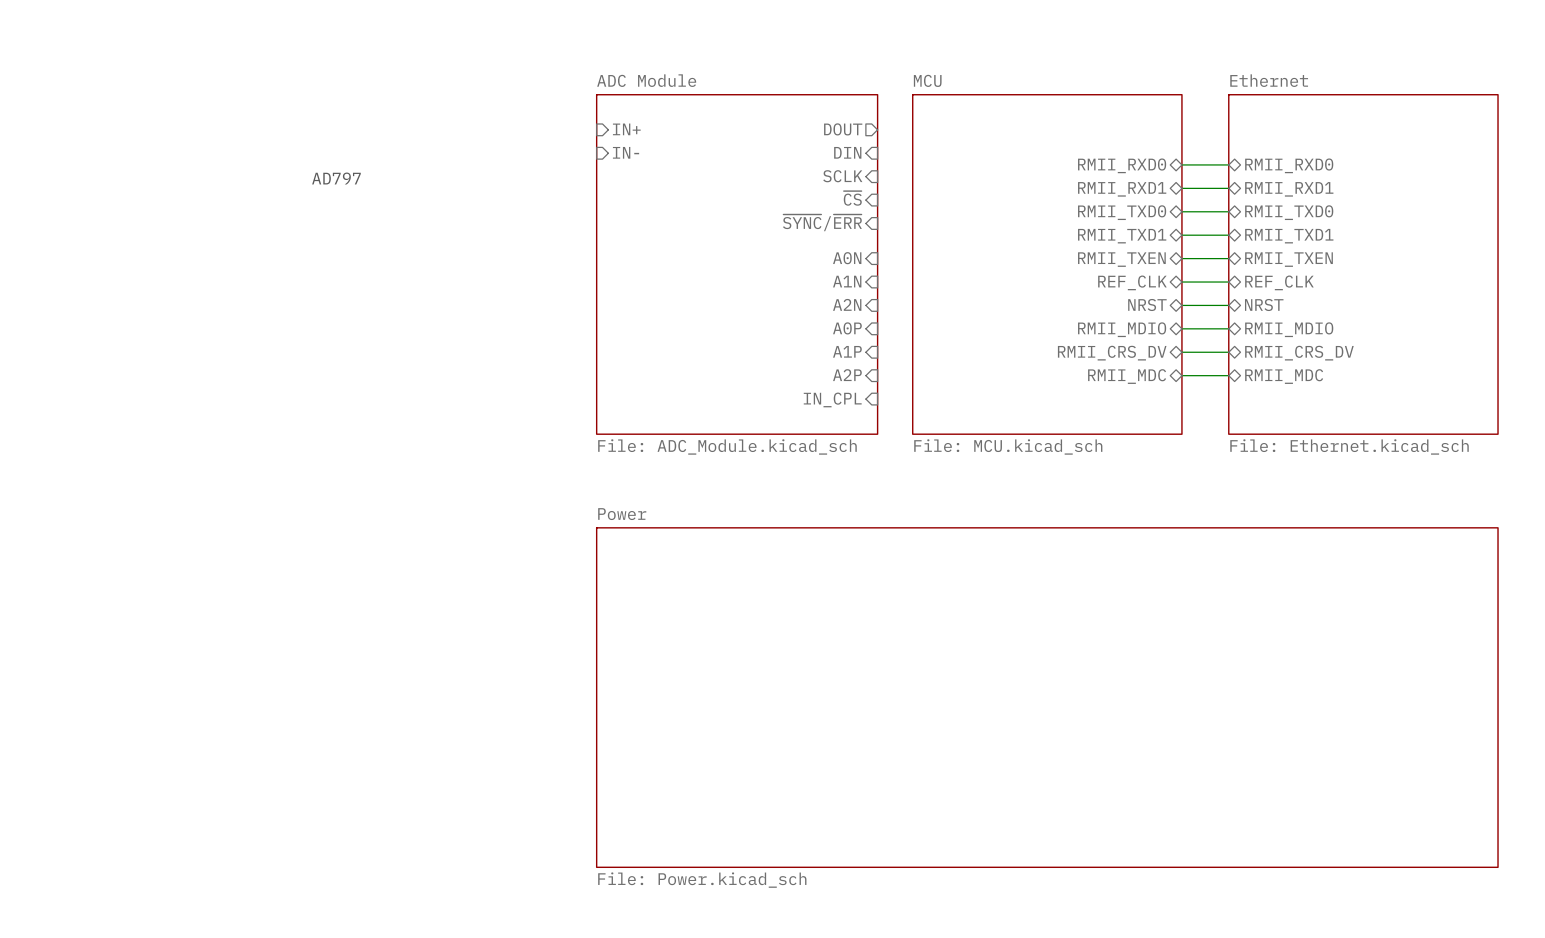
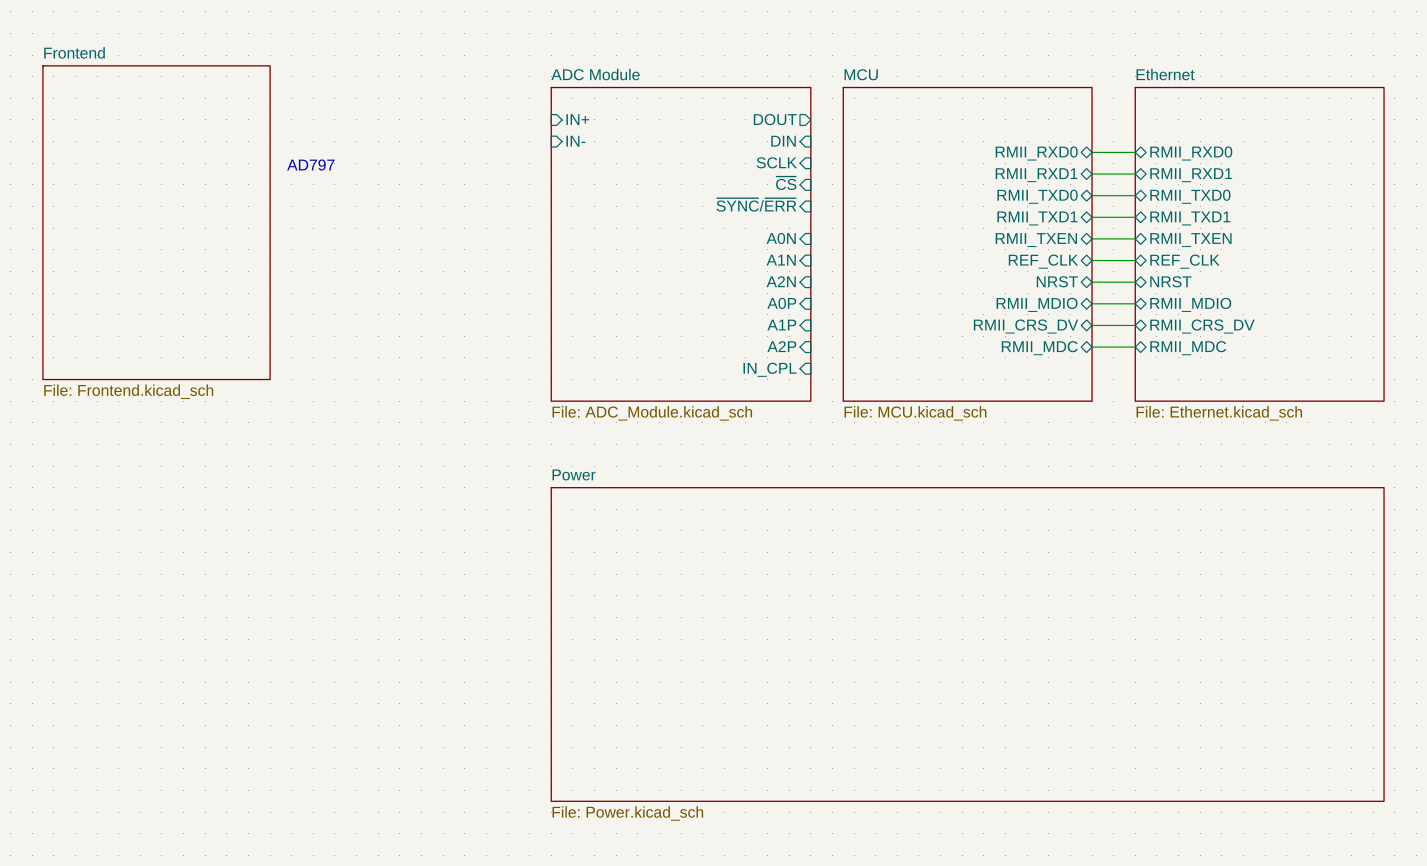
sheet Frontend: none -> File: Frontend.kicad_sch (156, 222)

